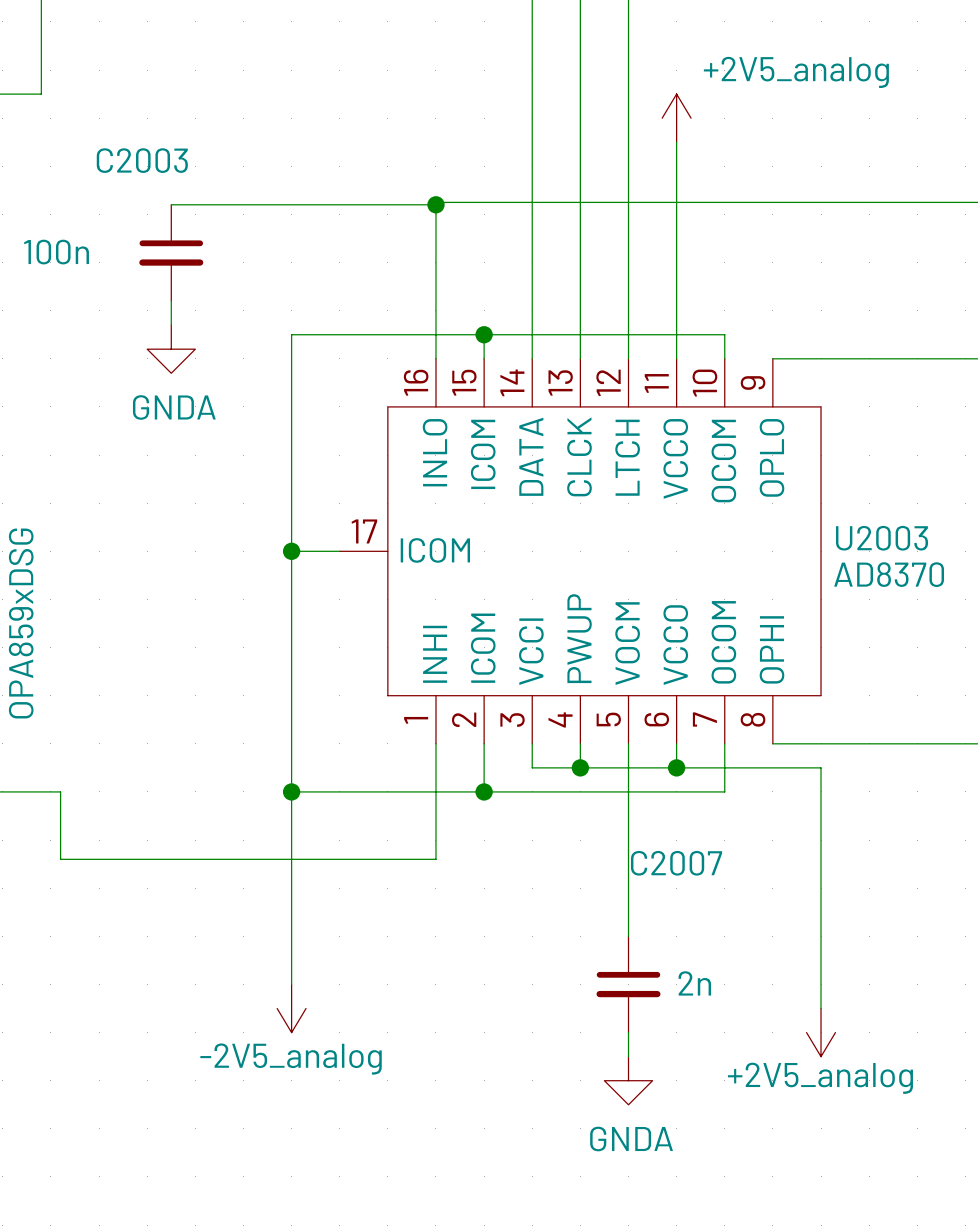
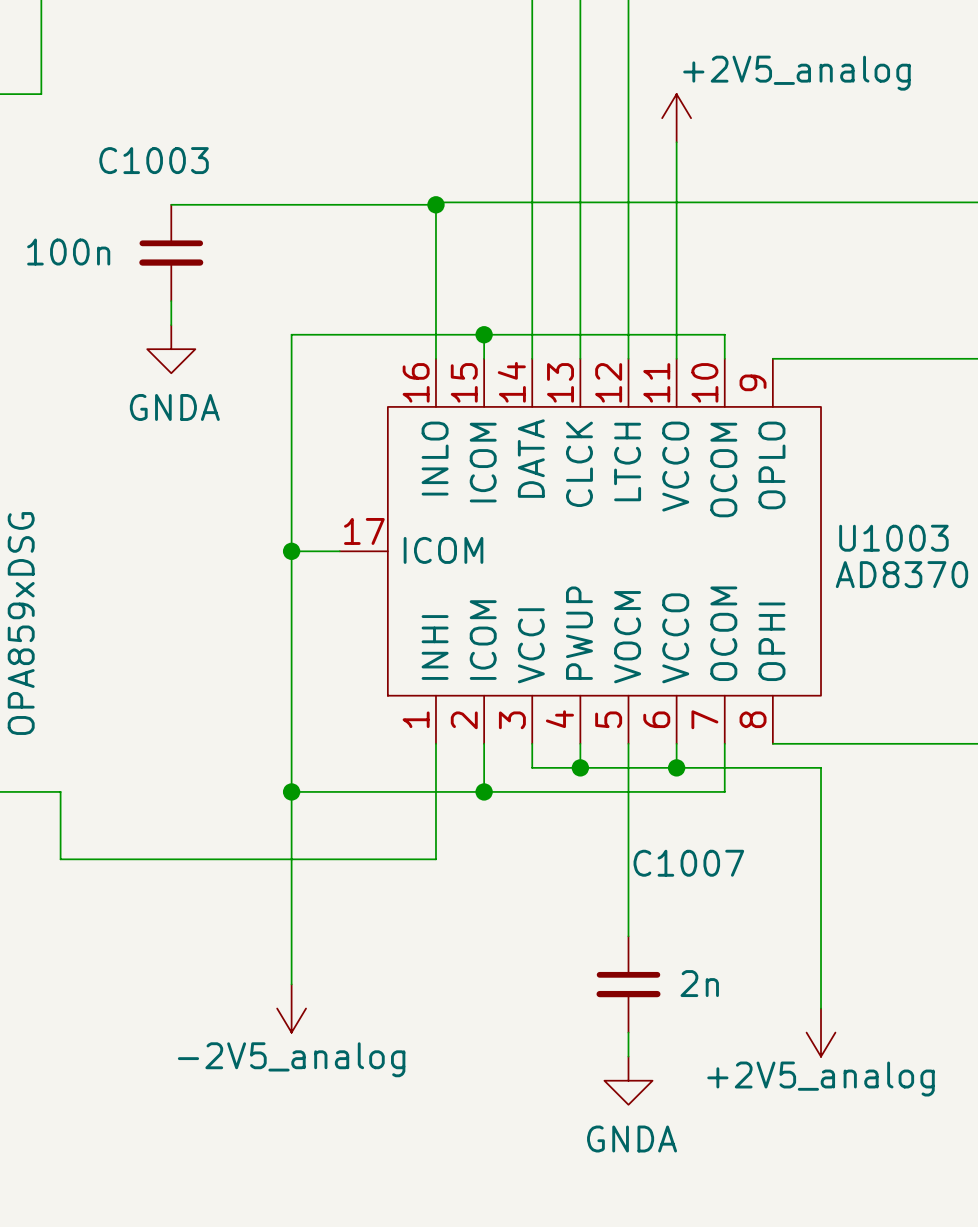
C2003 name: C2003 (142, 160) -> C1003 (154, 160)
U2003 name: U2003 (882, 538) -> U1003 (893, 538)
C2007 name: C2007 (676, 863) -> C1007 (688, 863)

